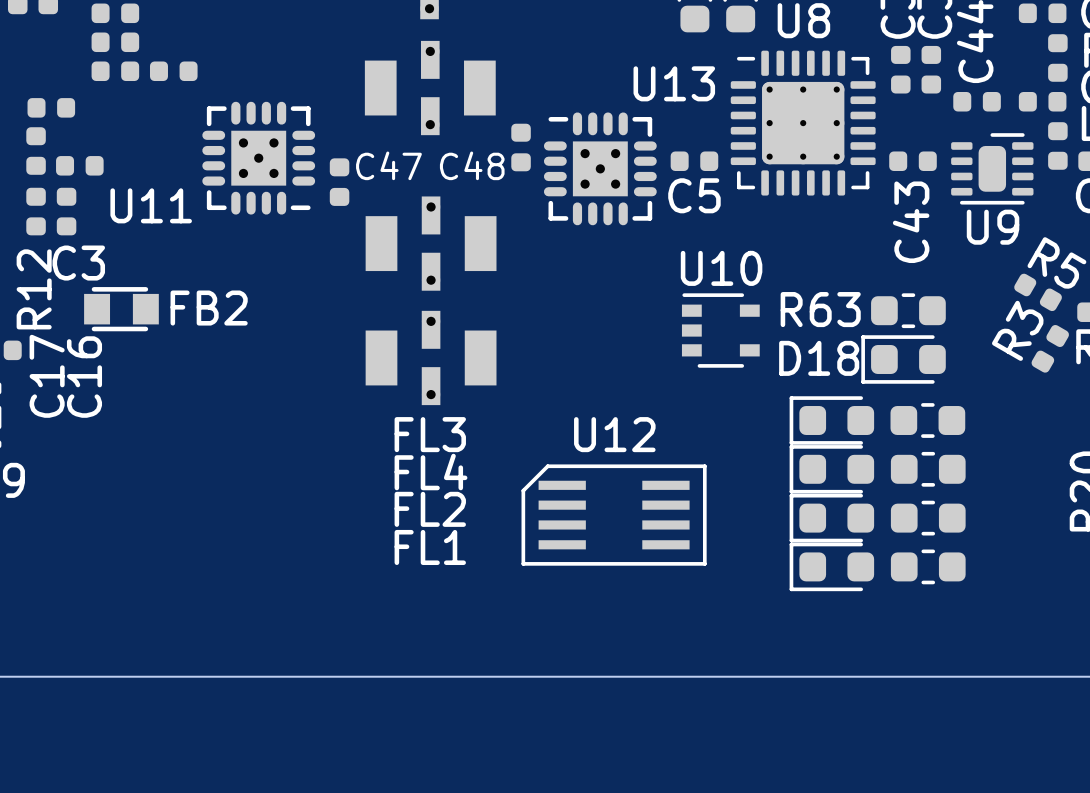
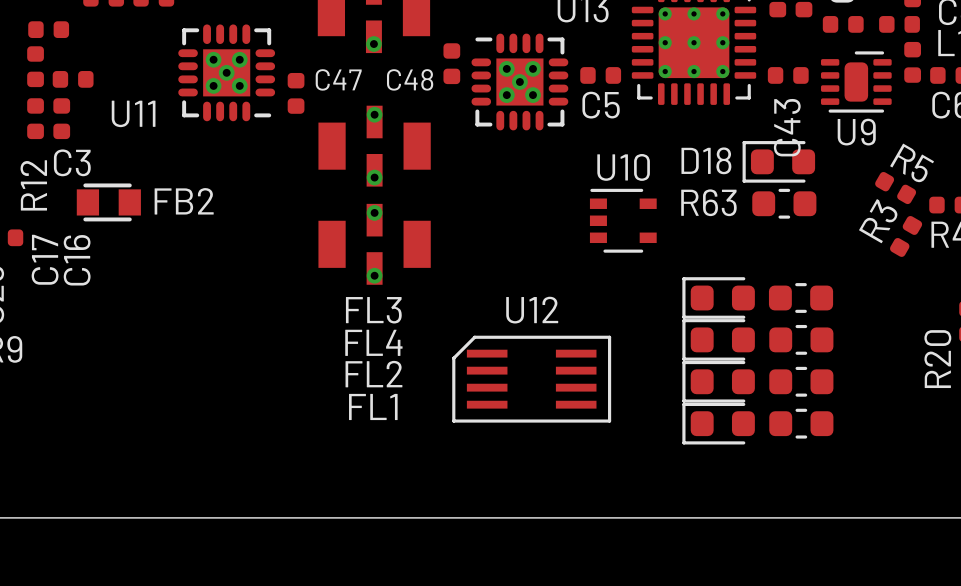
D18 position: (903, 359) -> (778, 161)

